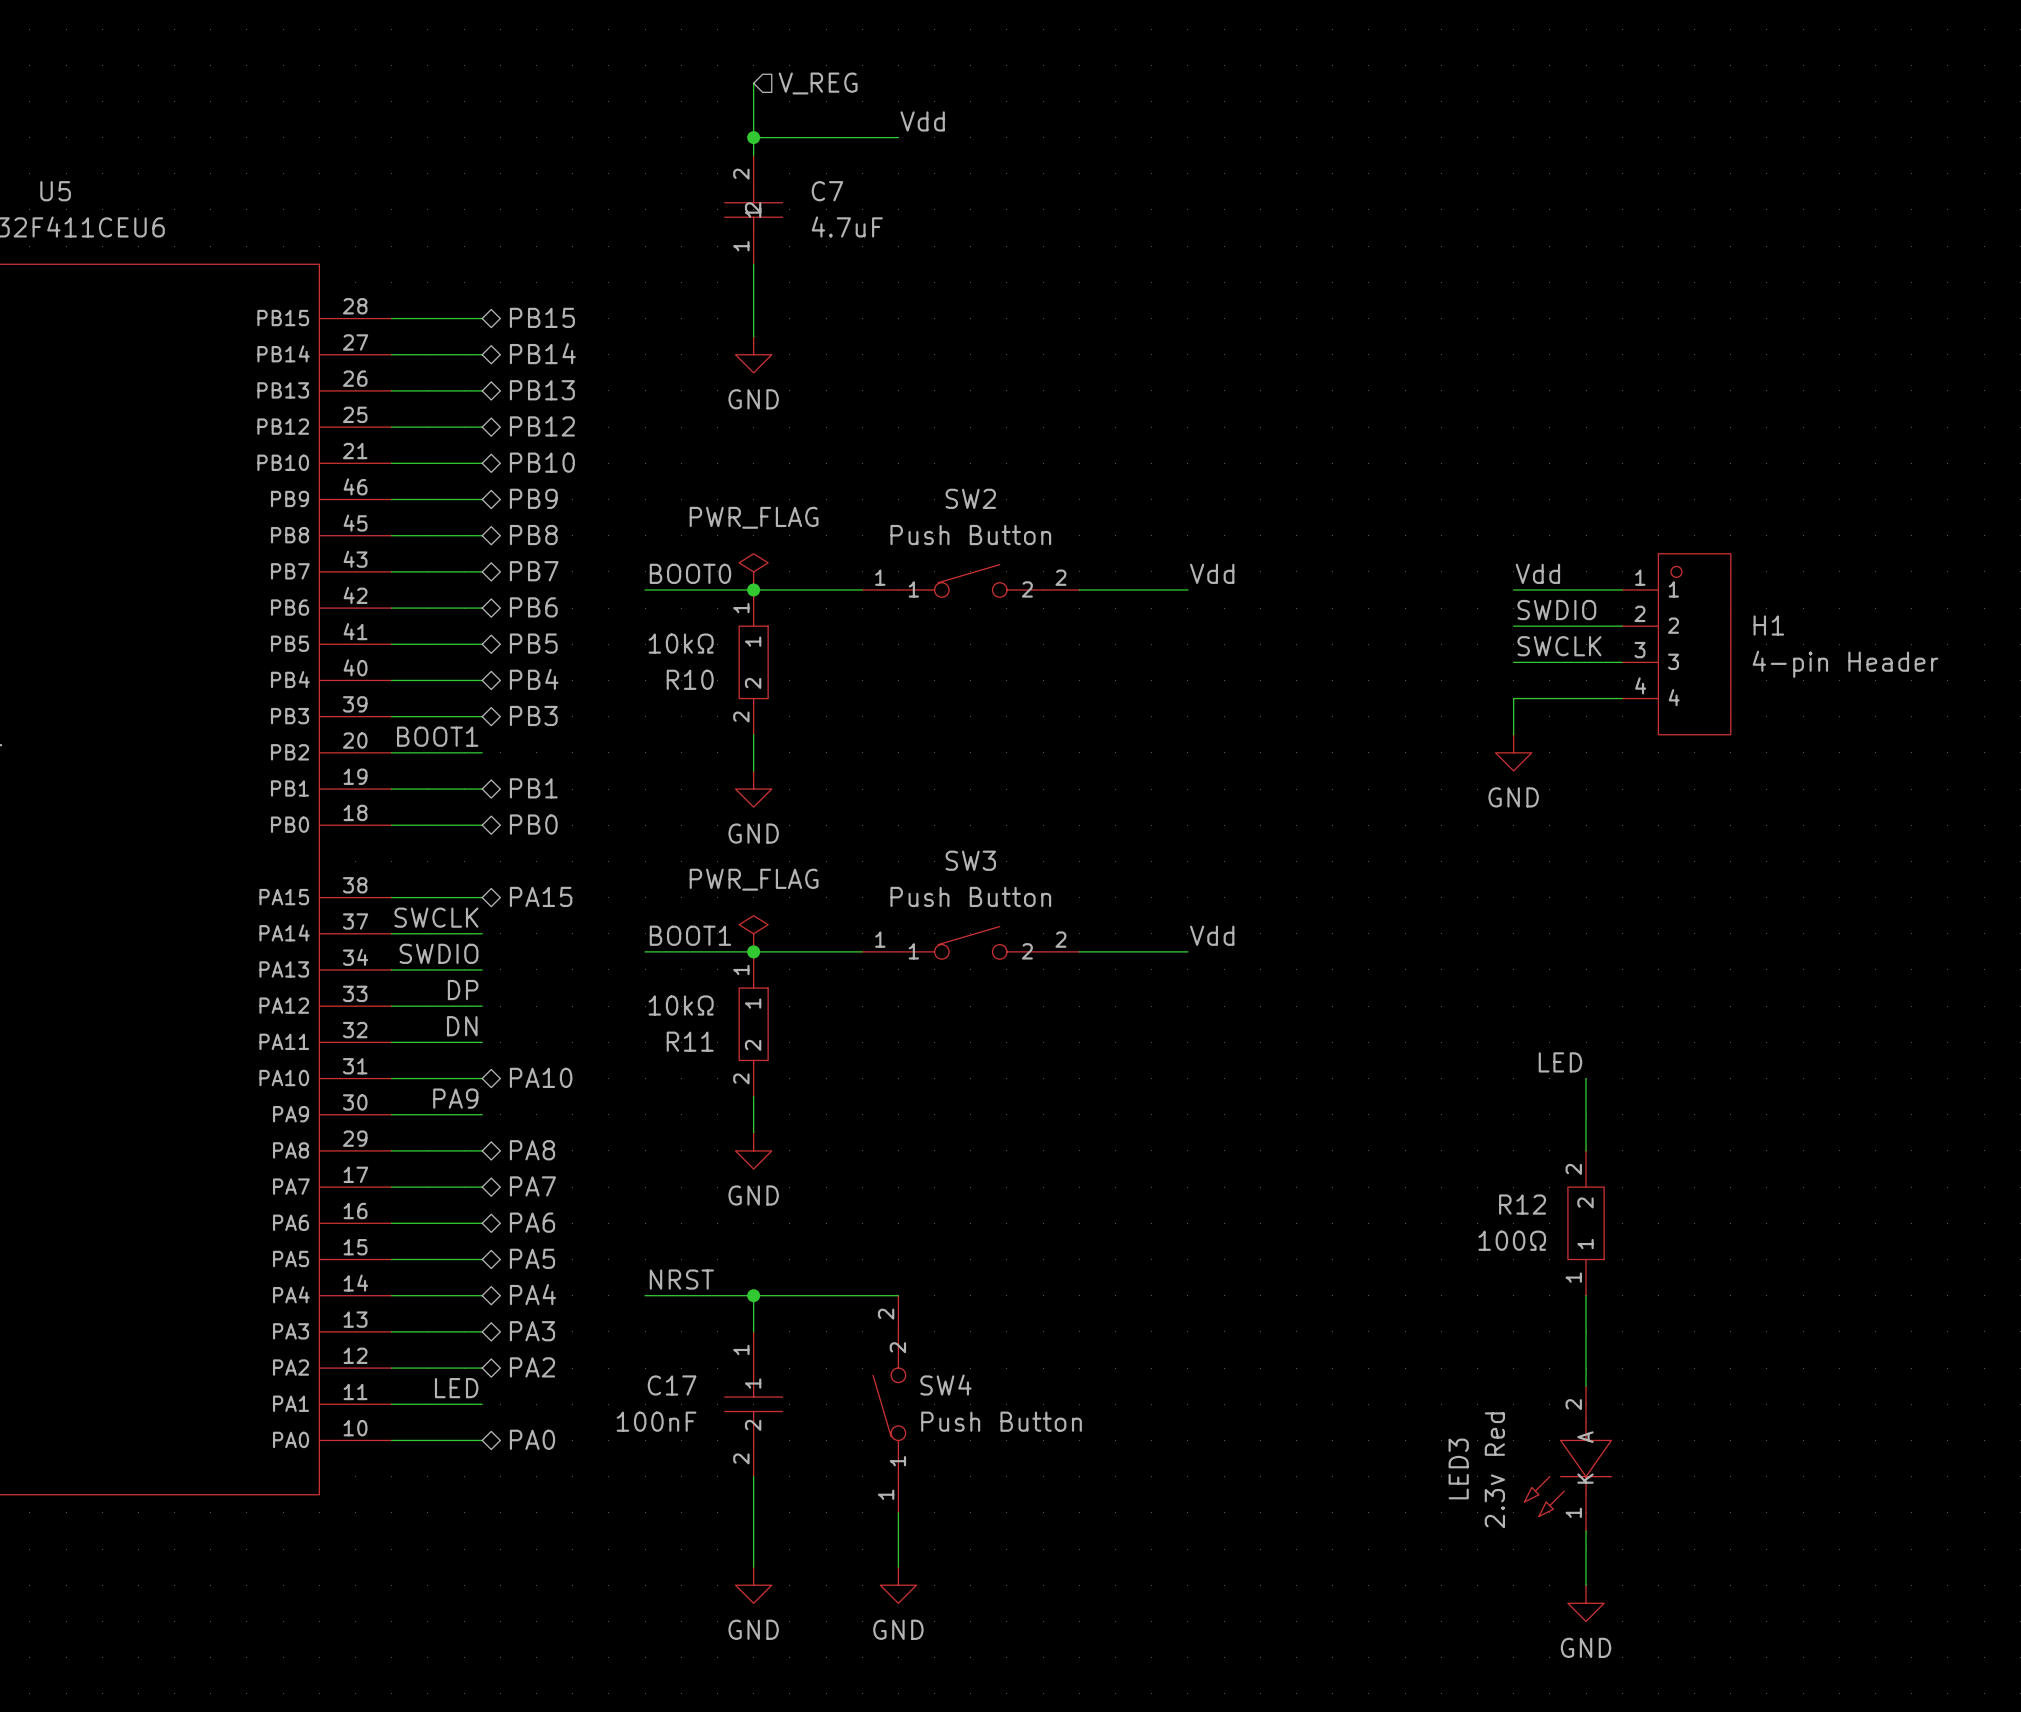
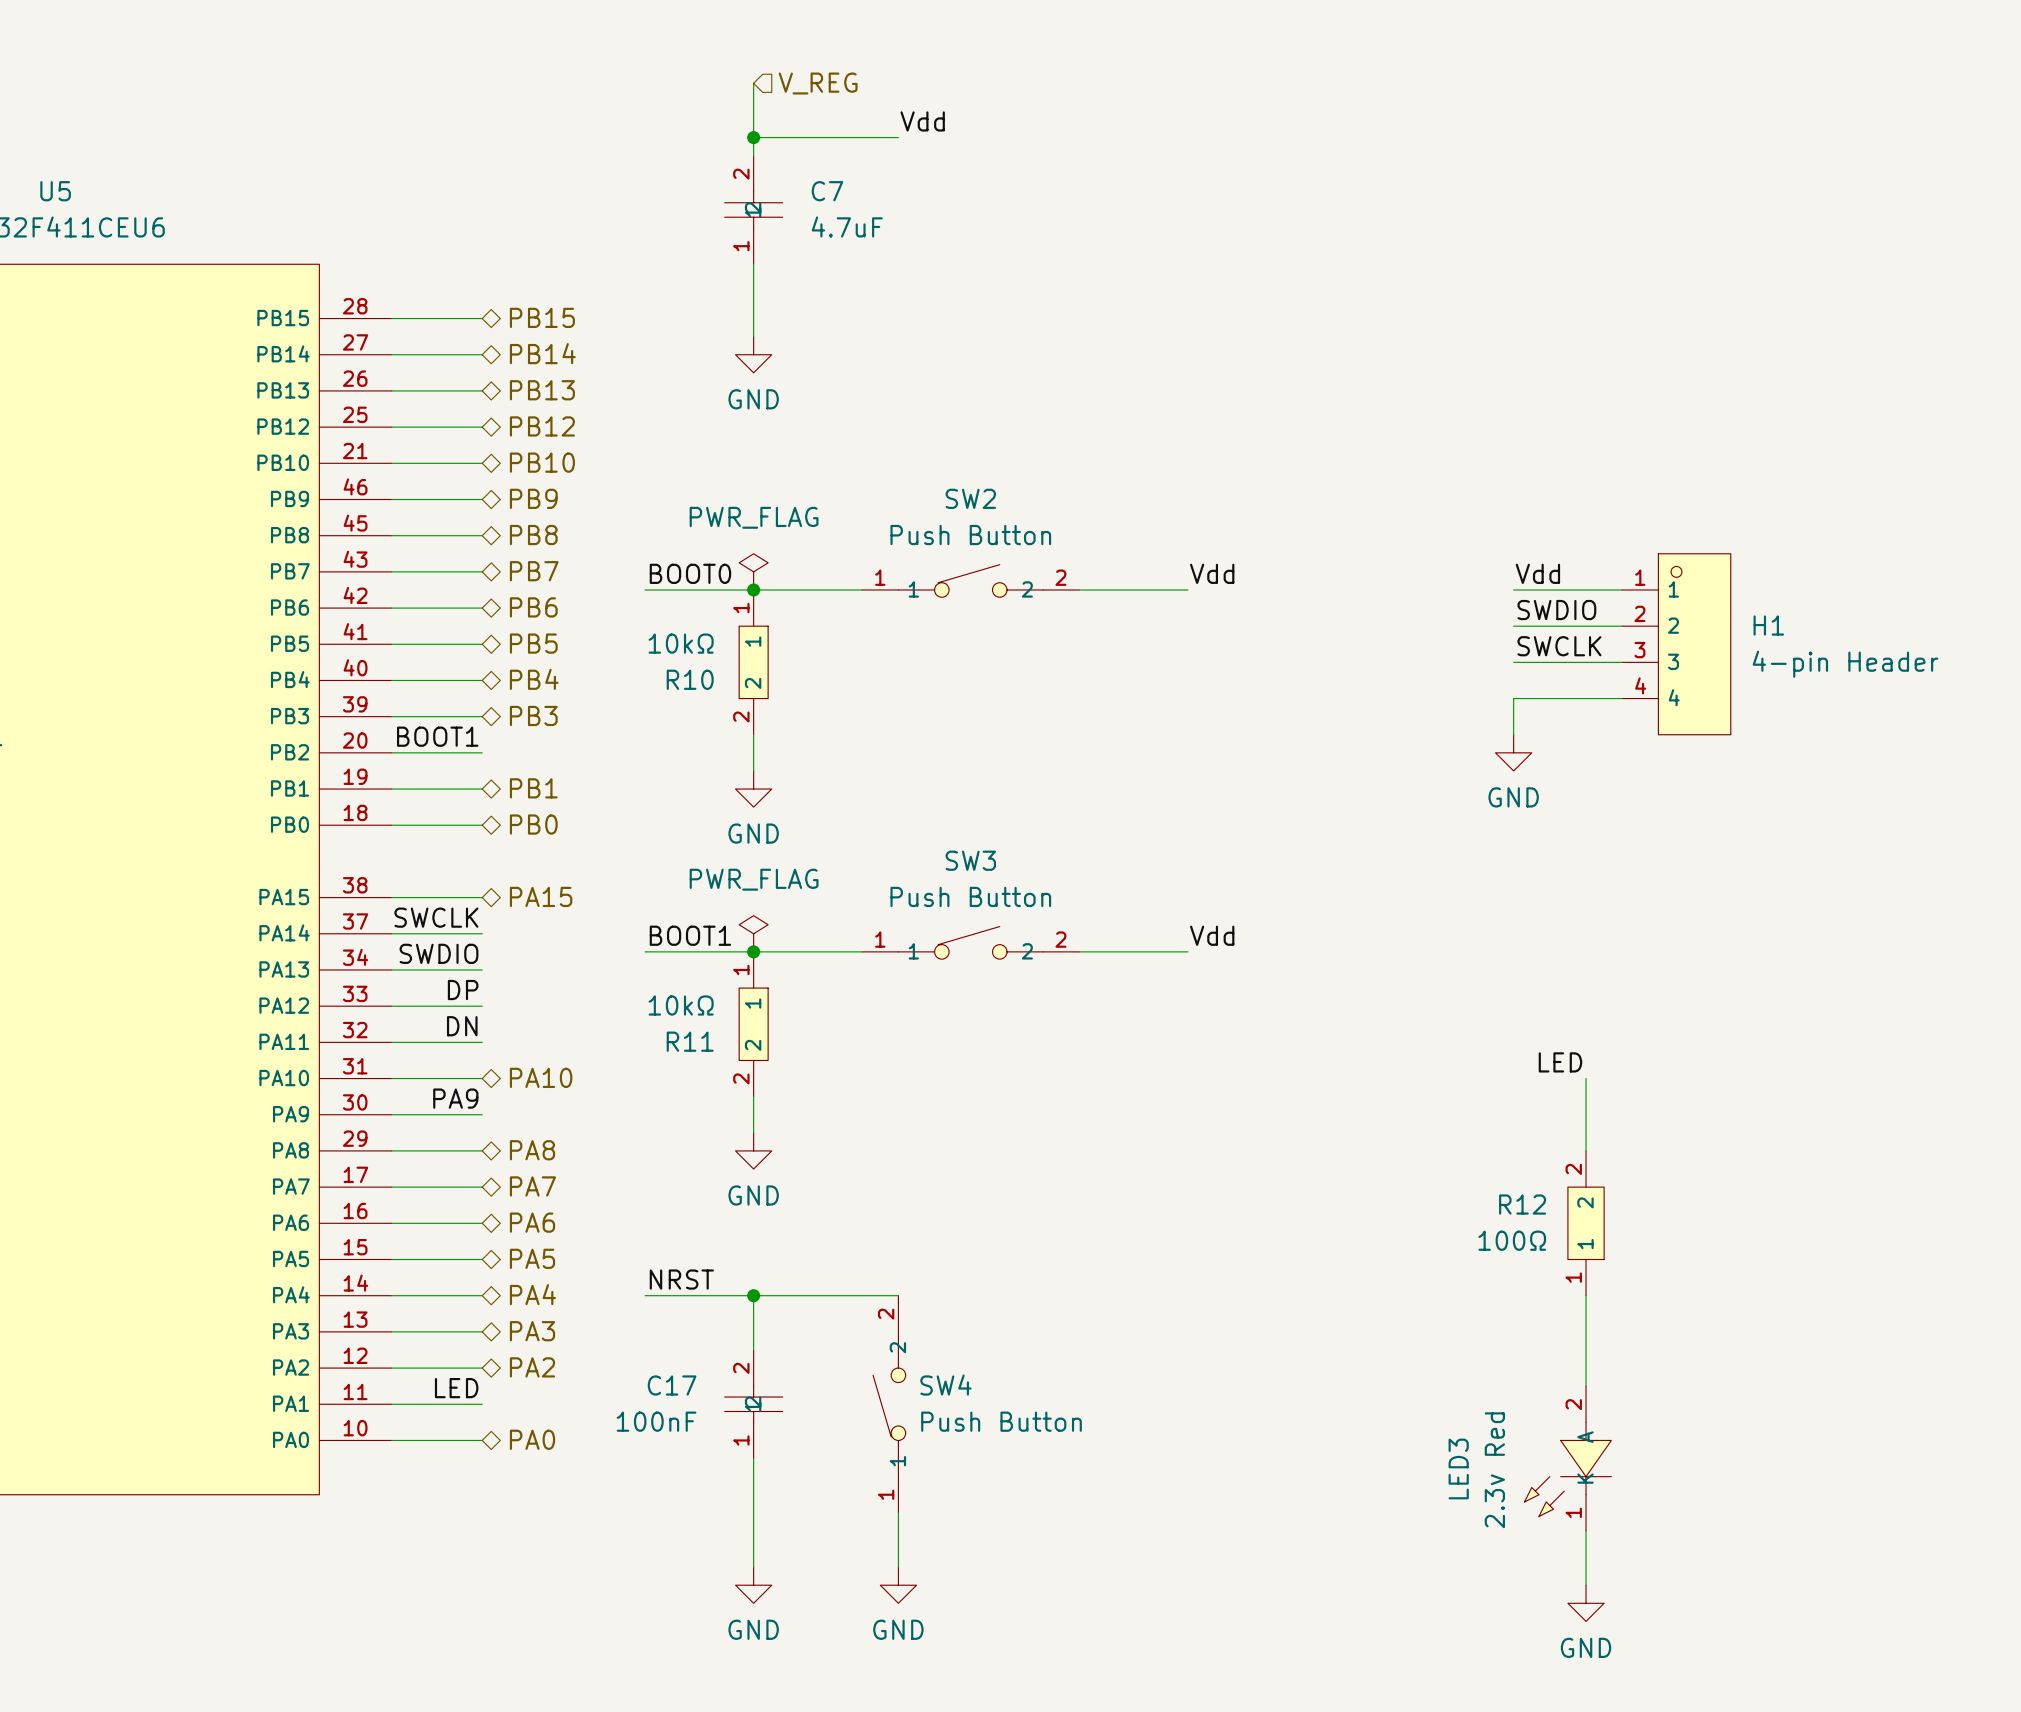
C17 symbol: [724, 1331, 783, 1477] -> [724, 1349, 783, 1459]

